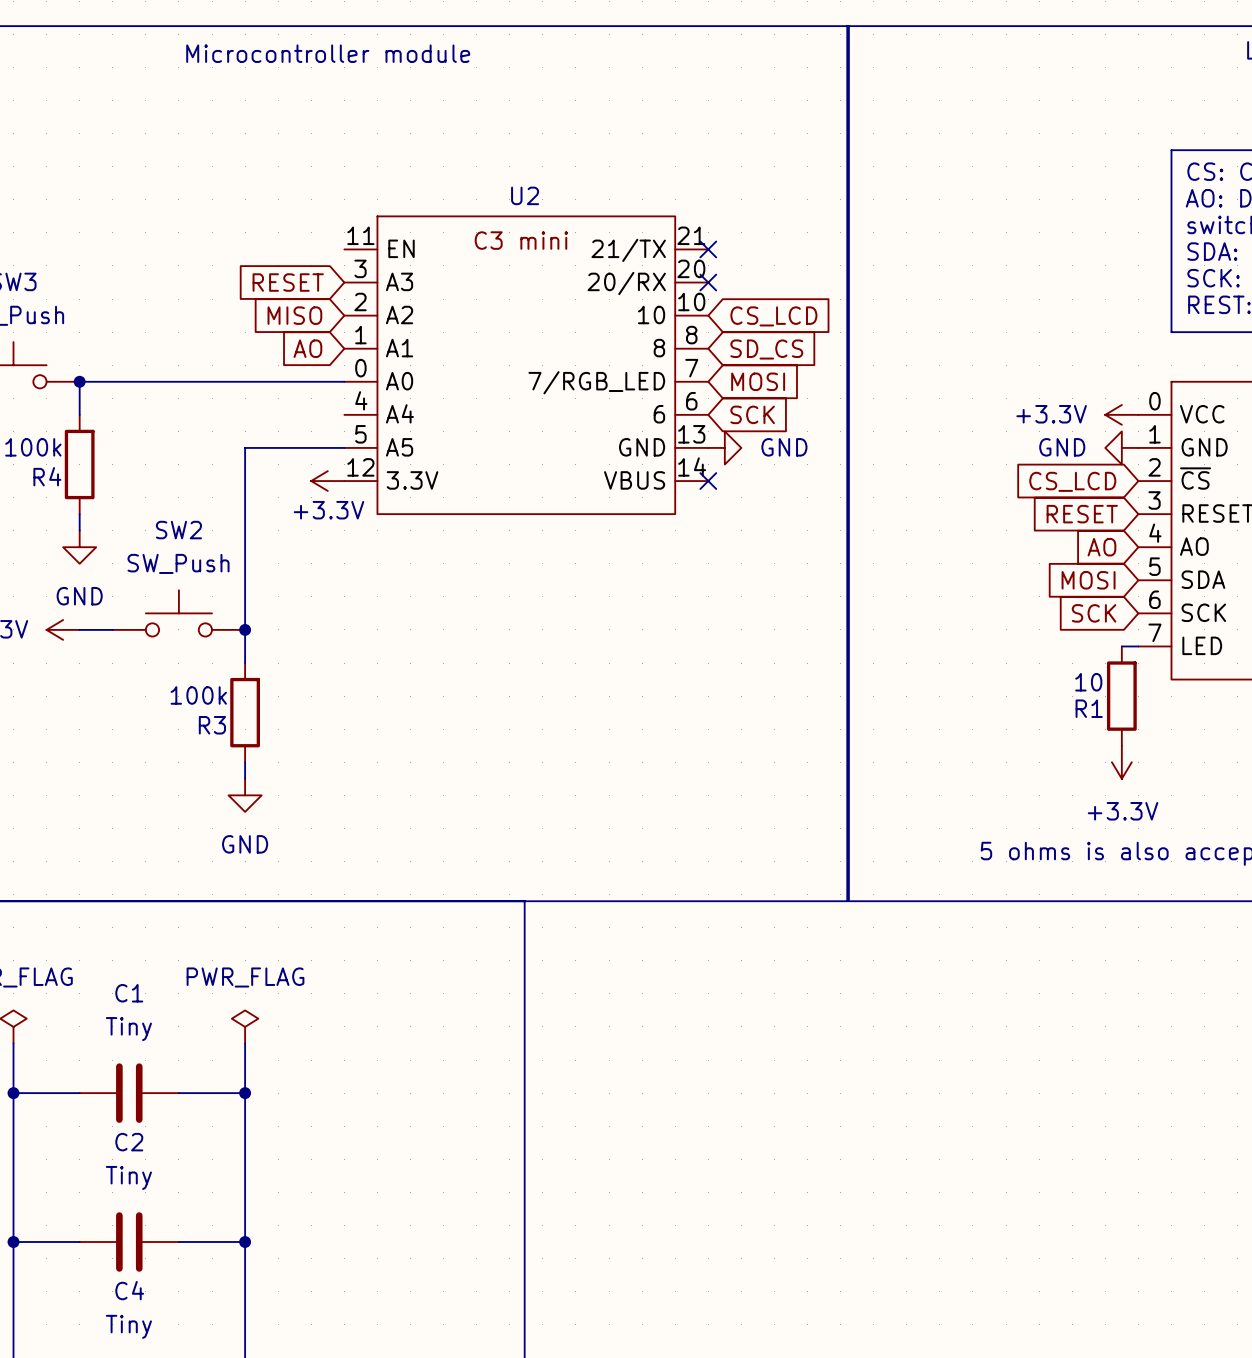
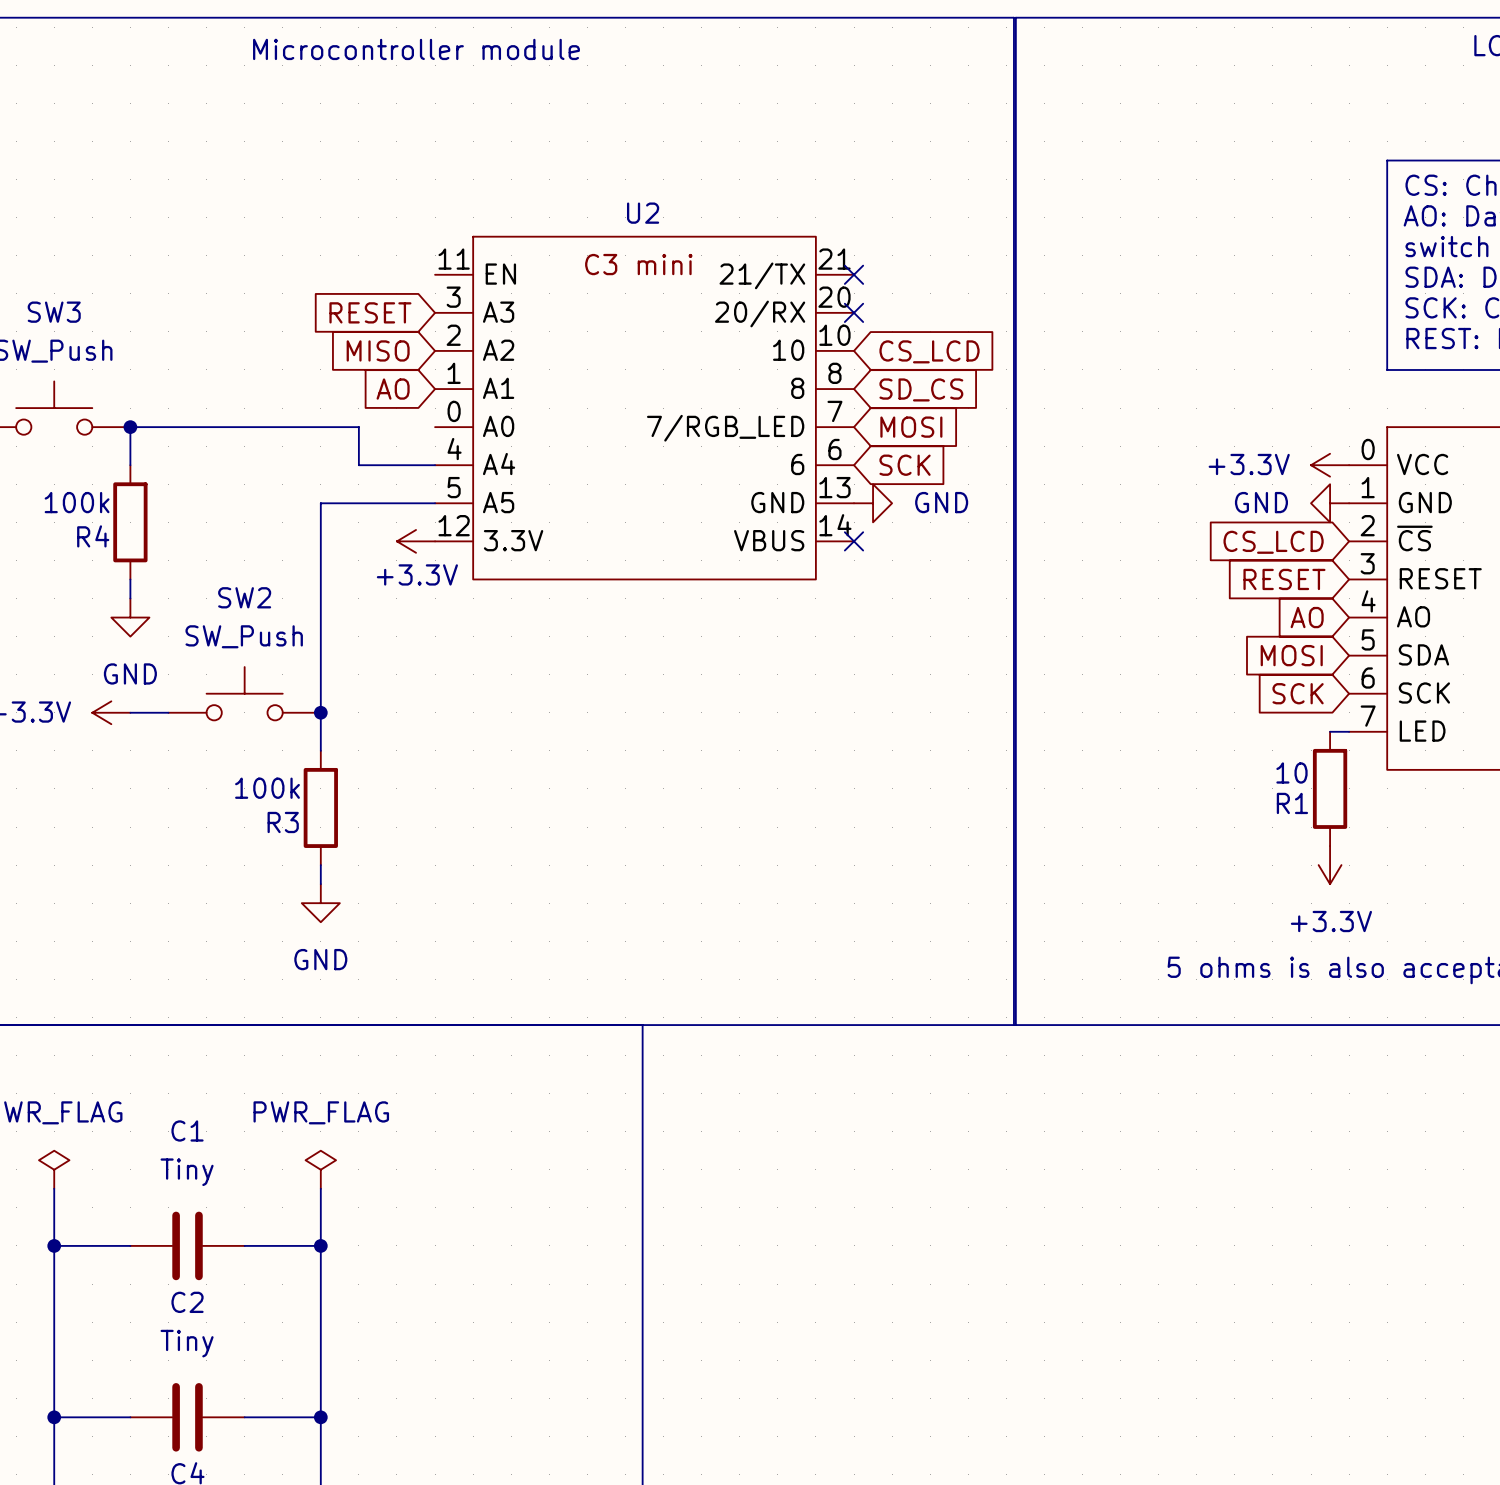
wire: (278, 381) (344, 381) -> (358, 427) (358, 465) (435, 465)

